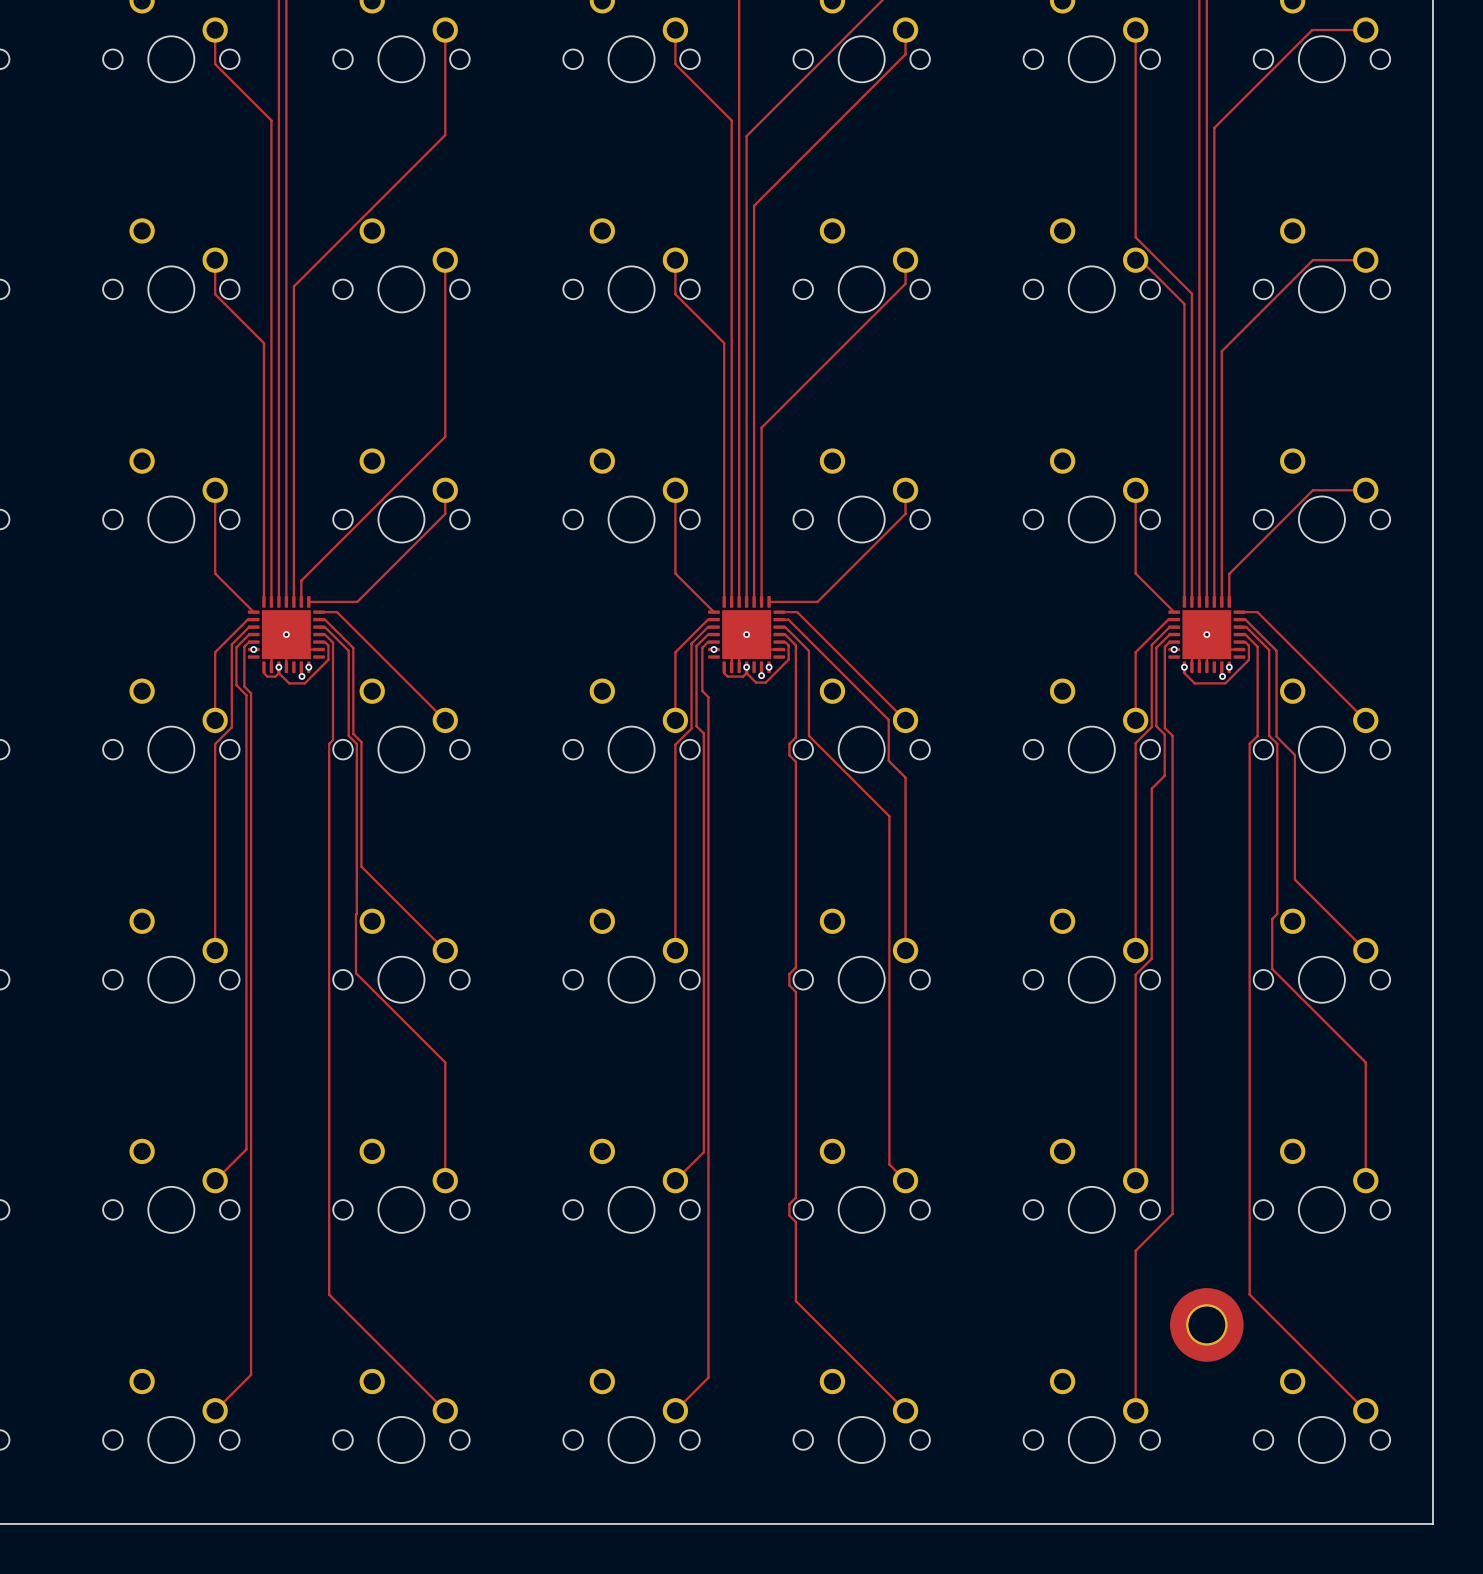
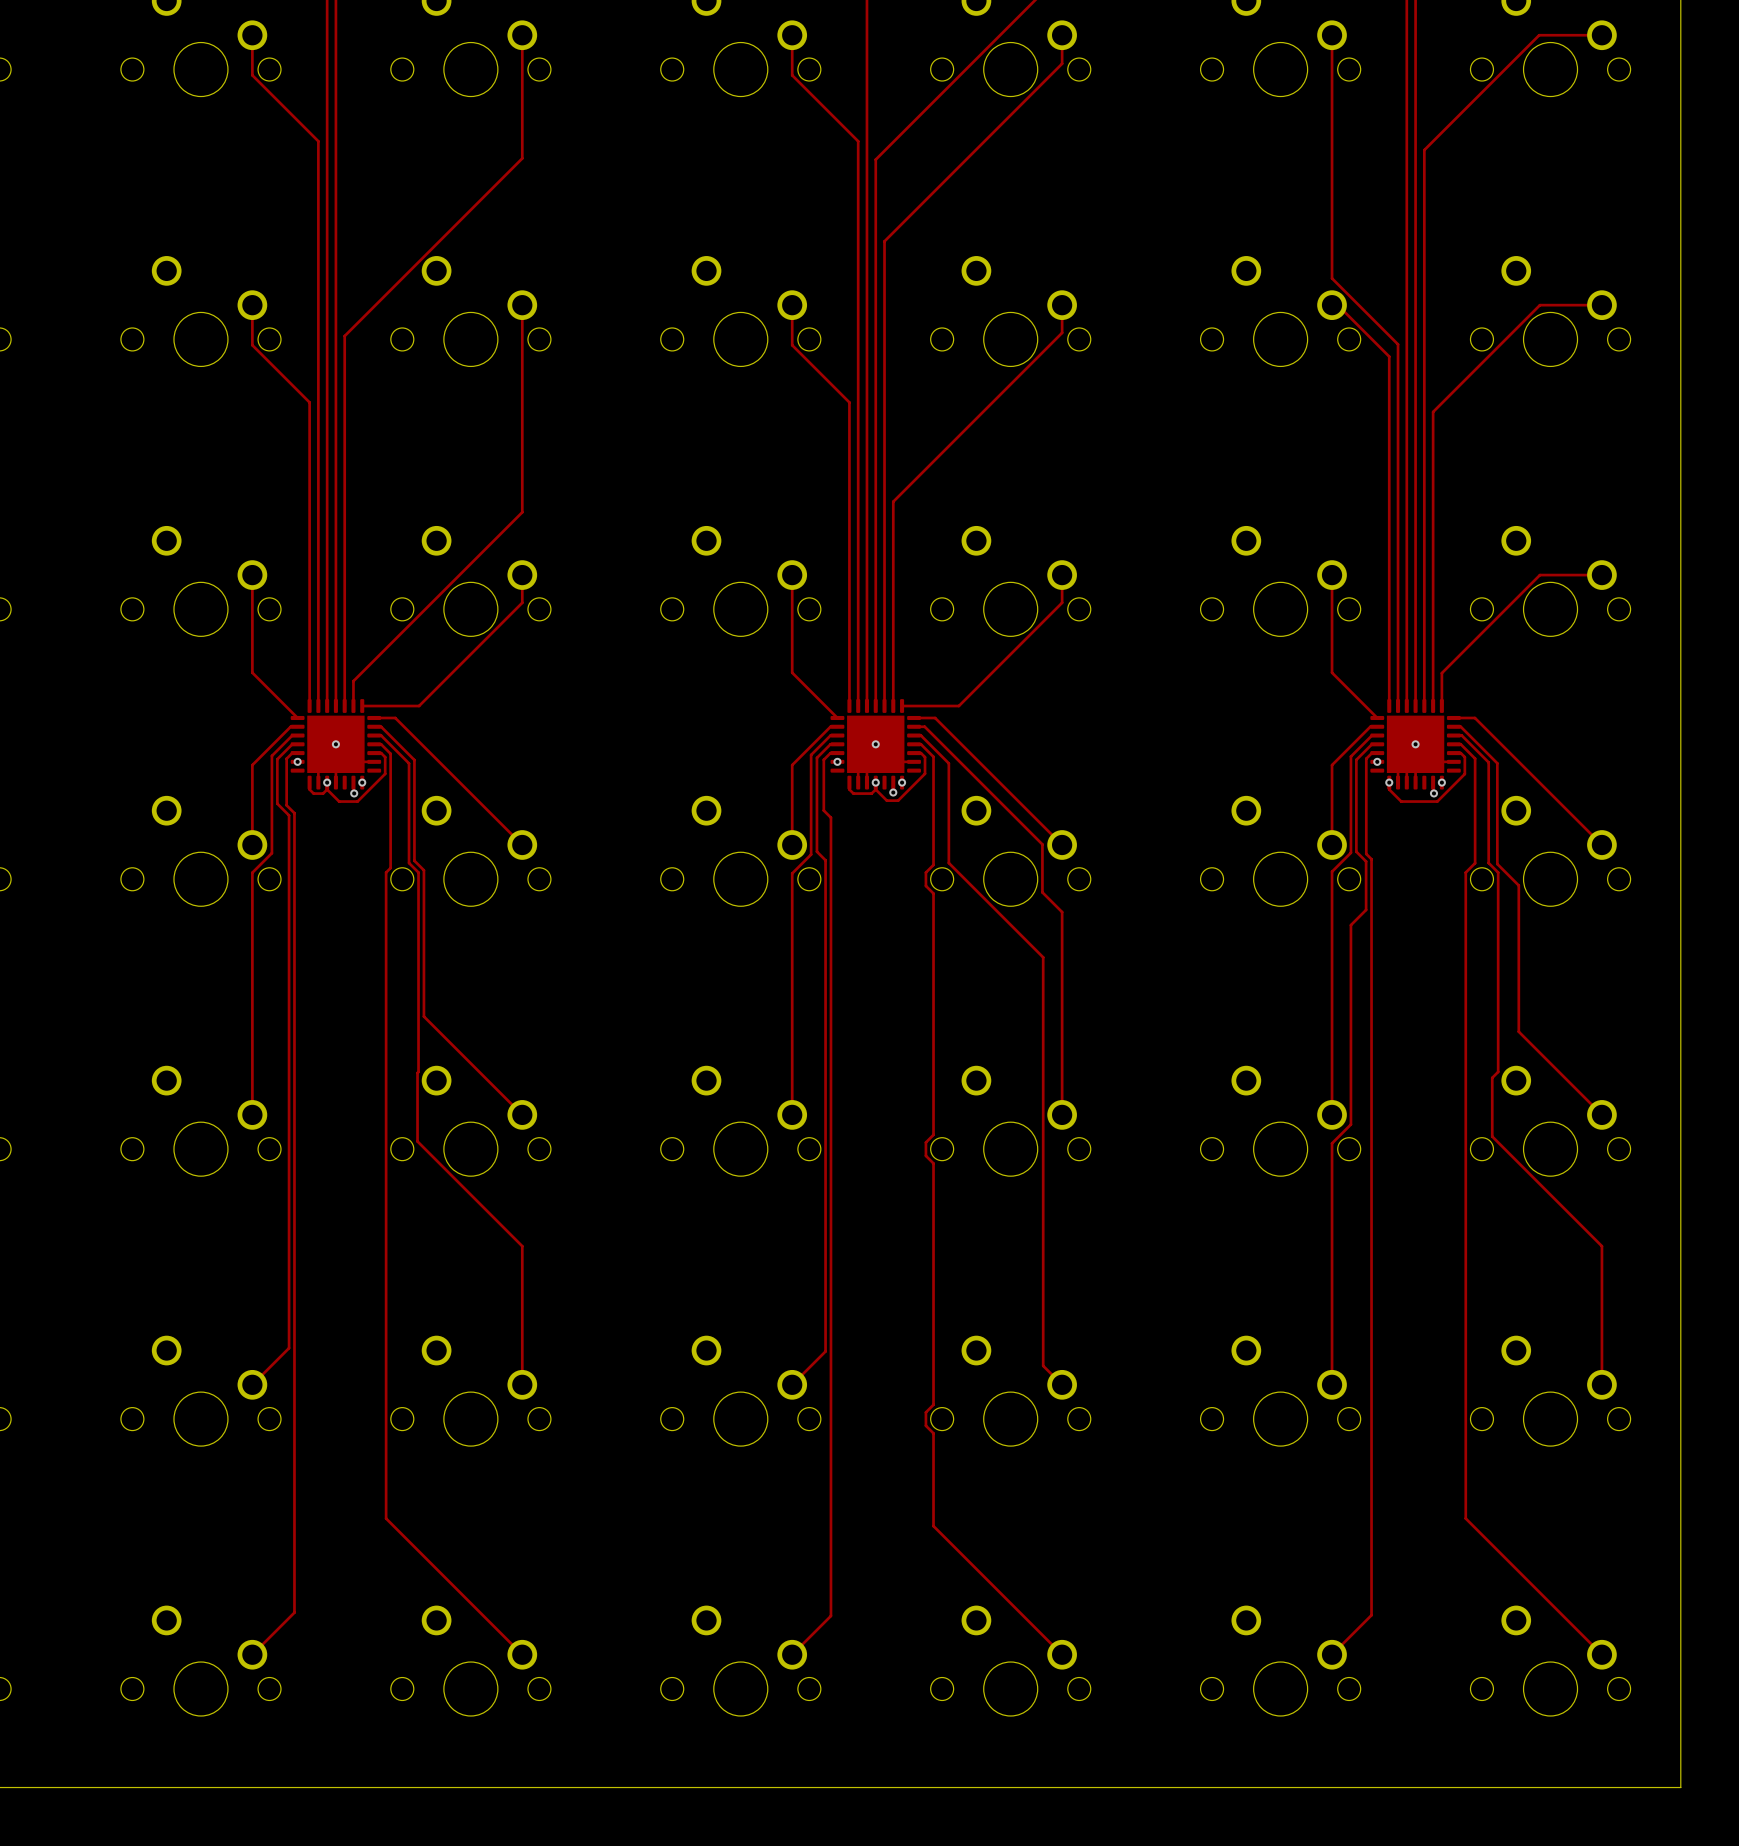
top track: (1169, 732) (1172, 735) (1172, 1213) (1135, 1250) (1135, 1410) -> (1371, 859) (1371, 1615) (1332, 1654)
part: (1206, 1324) -> none

